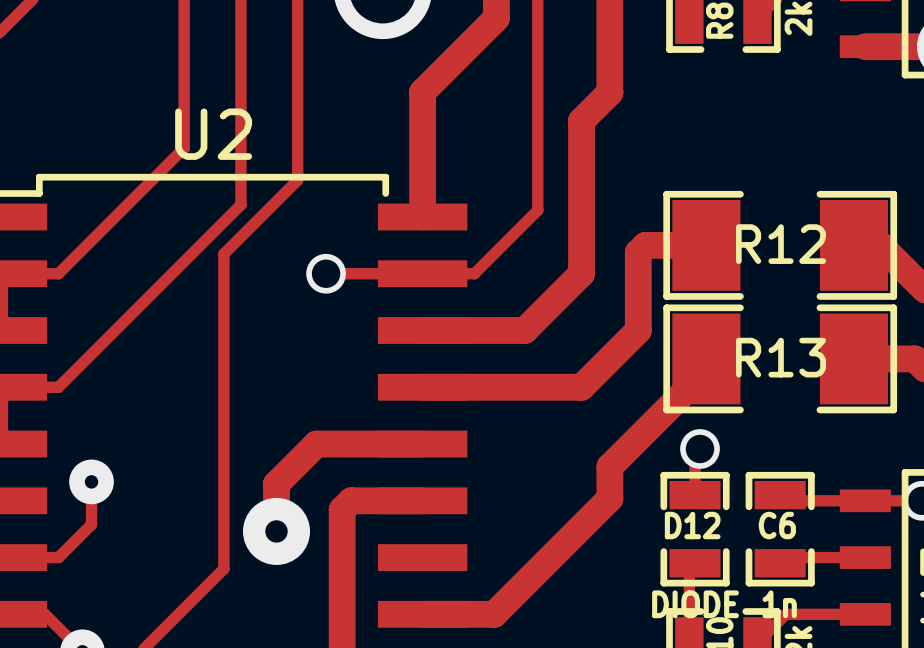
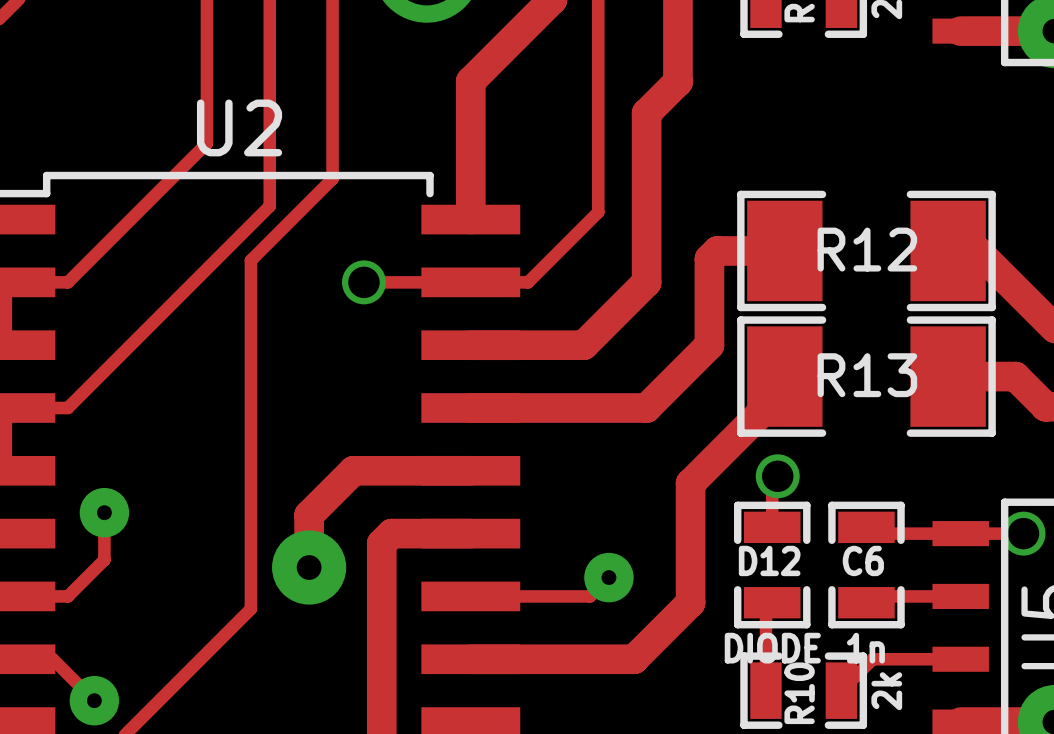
track: (621, 455) (609, 466) (609, 498) (494, 614) -> (690, 483) (690, 602) (634, 659) (549, 659)
track: none -> (608, 577) (590, 596) (470, 596)
via: none -> (608, 577)

